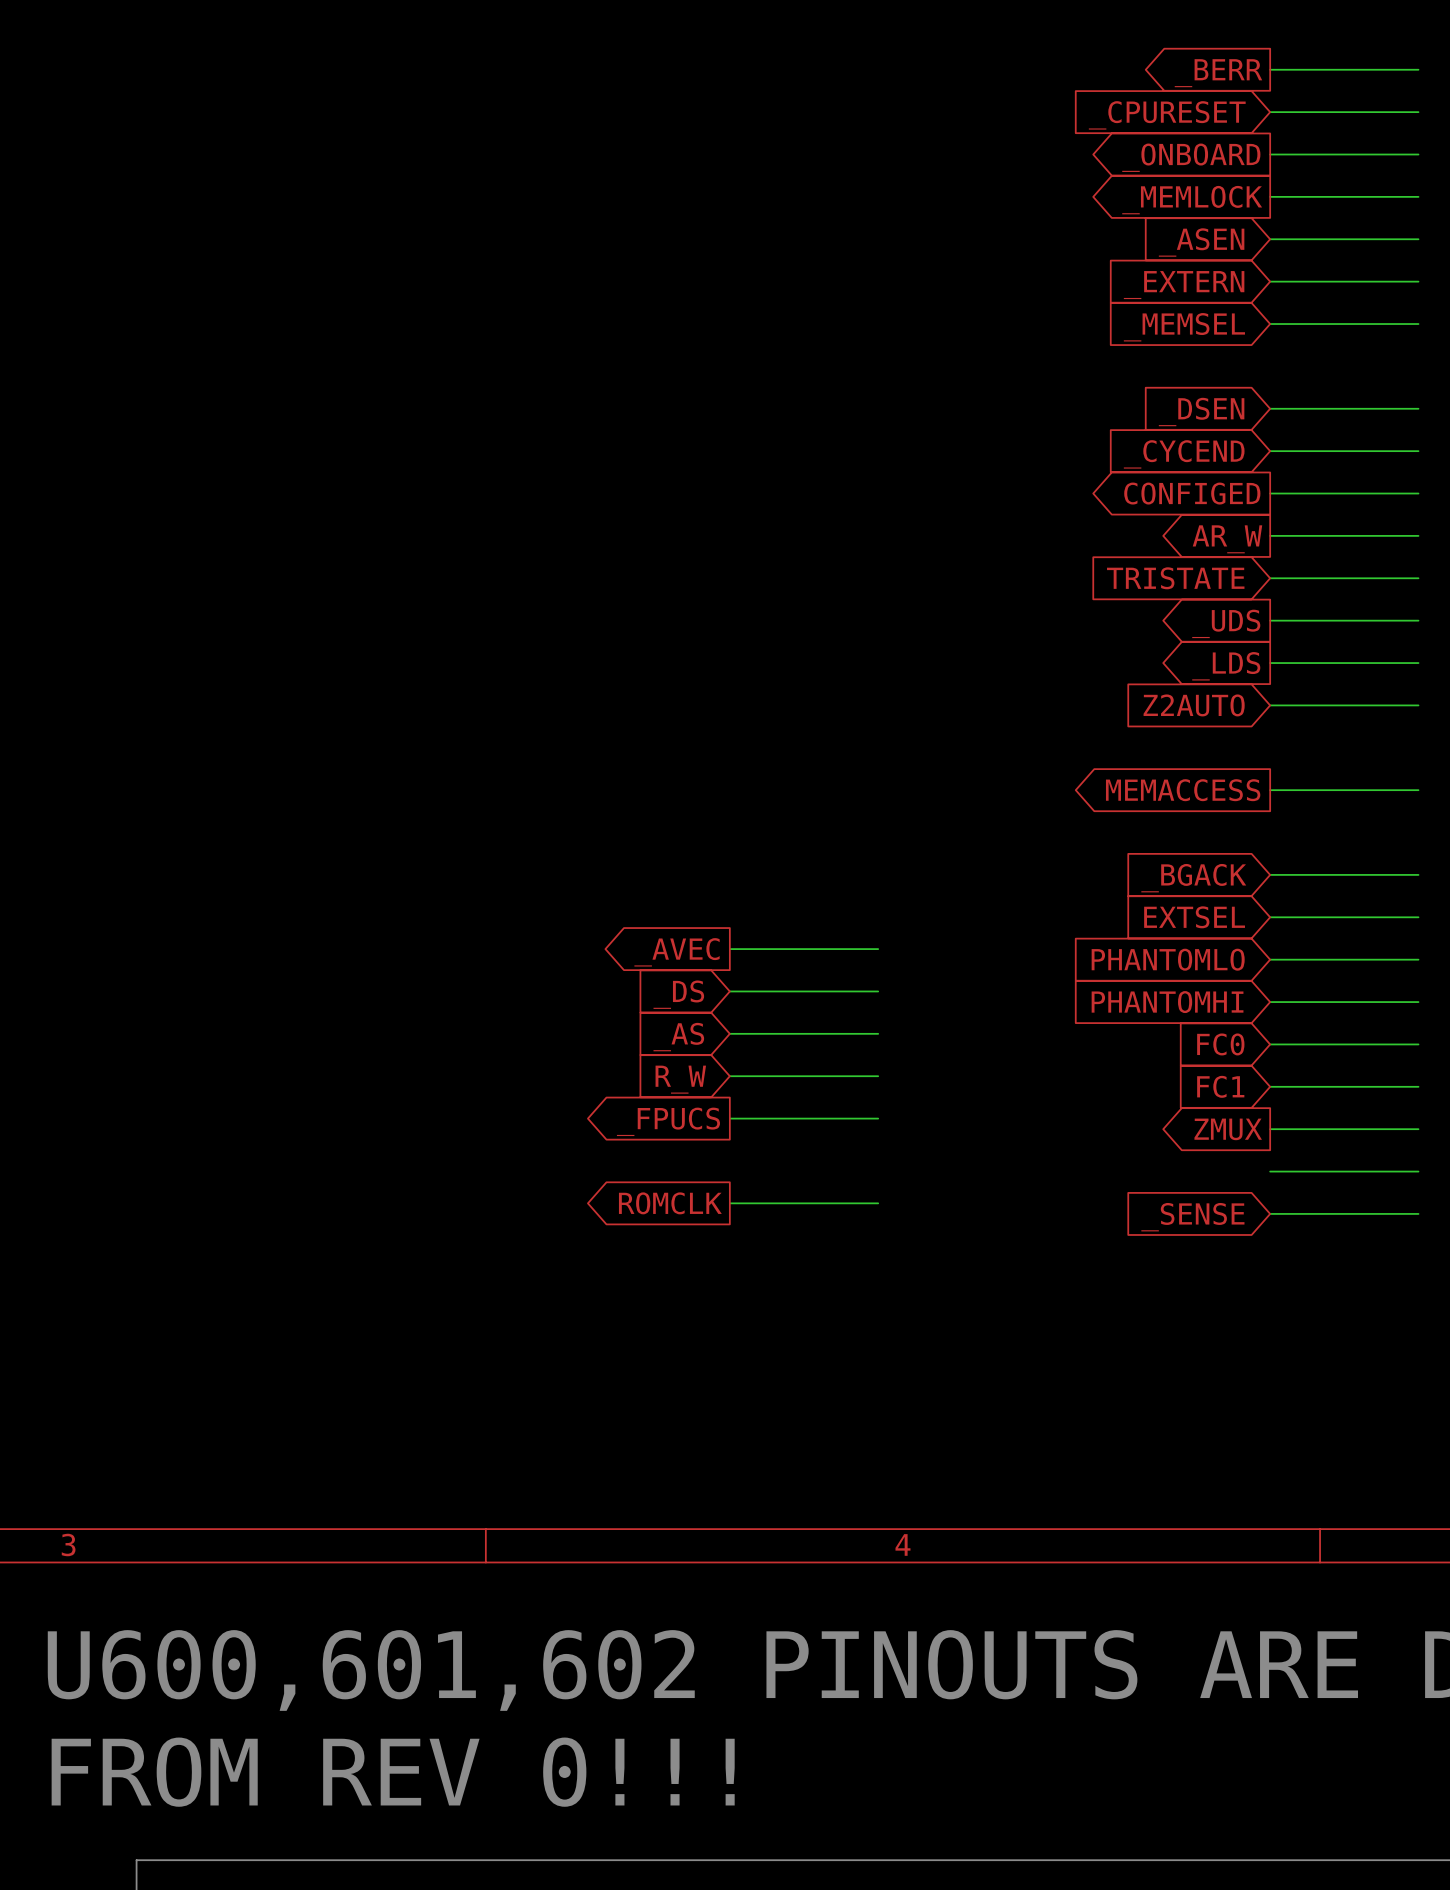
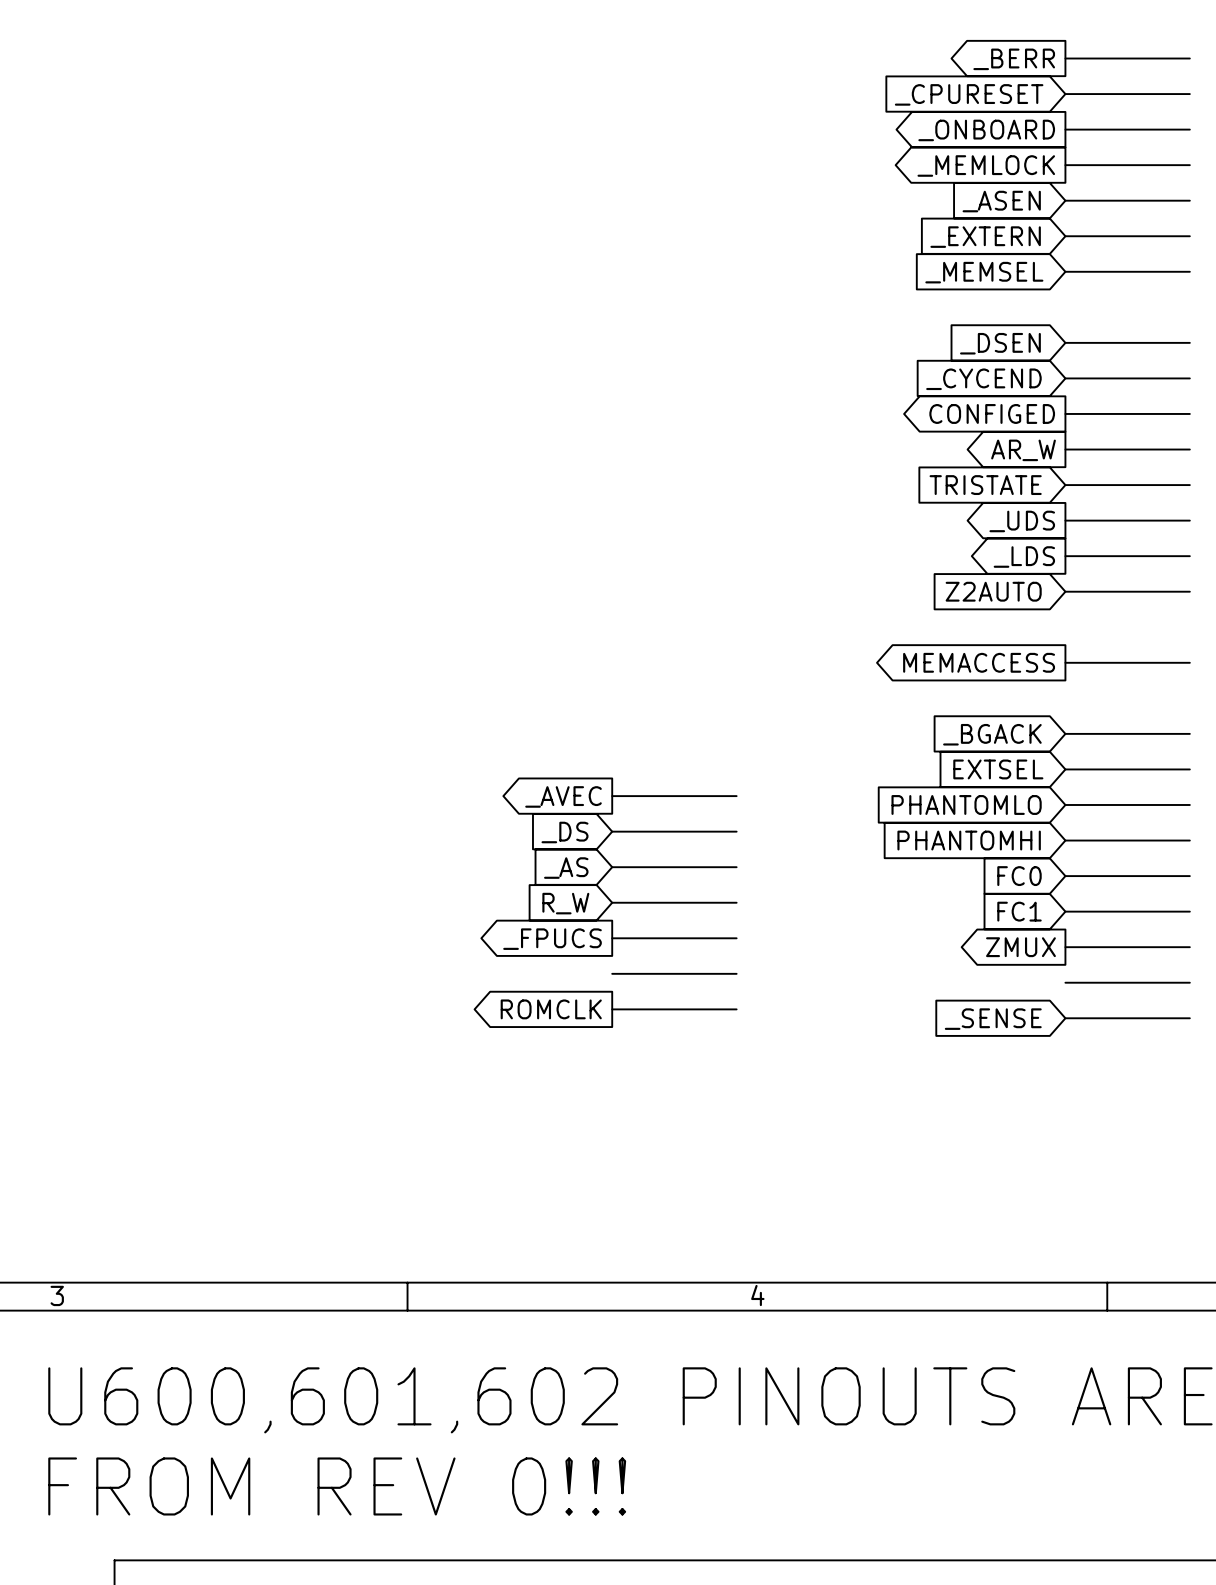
wire: none -> (612, 973) (736, 973)

